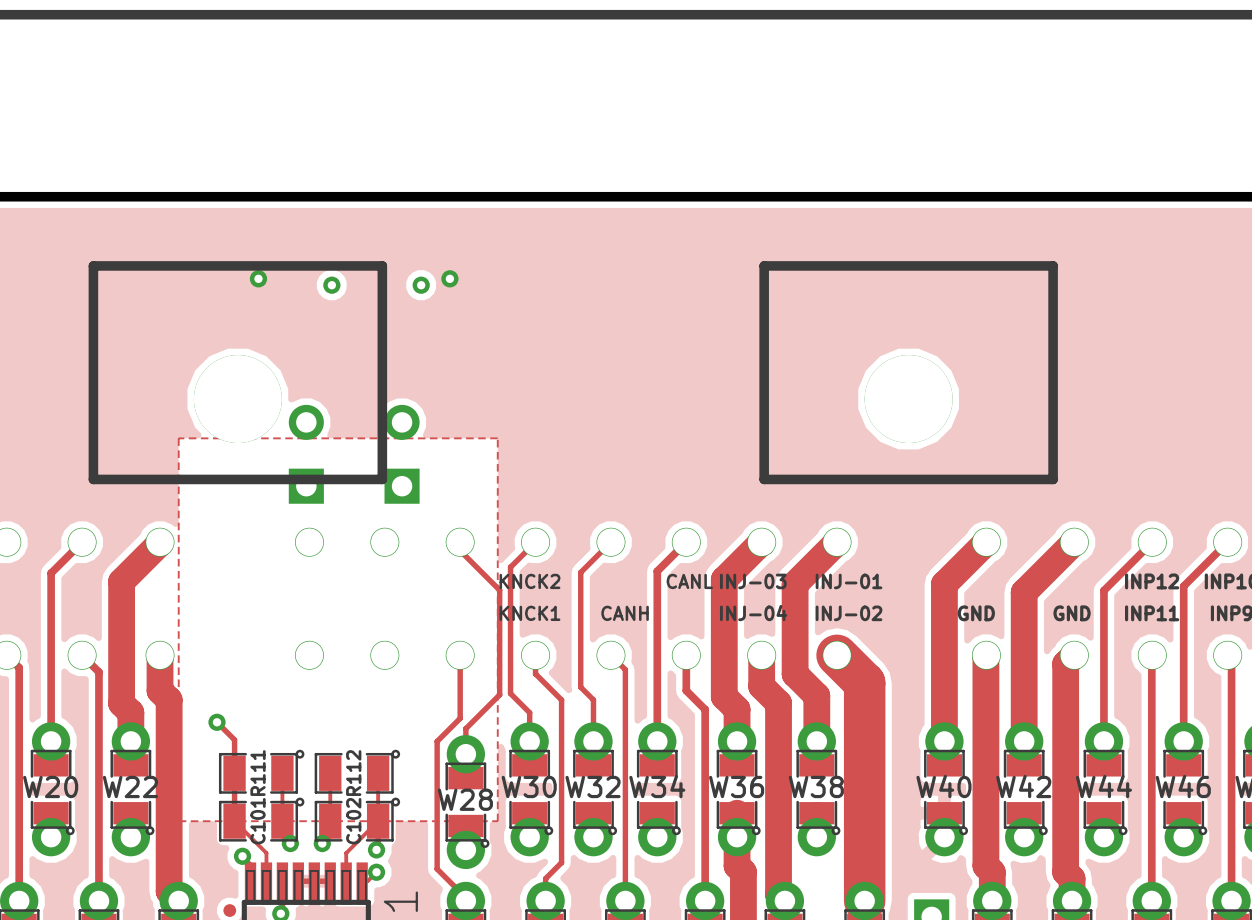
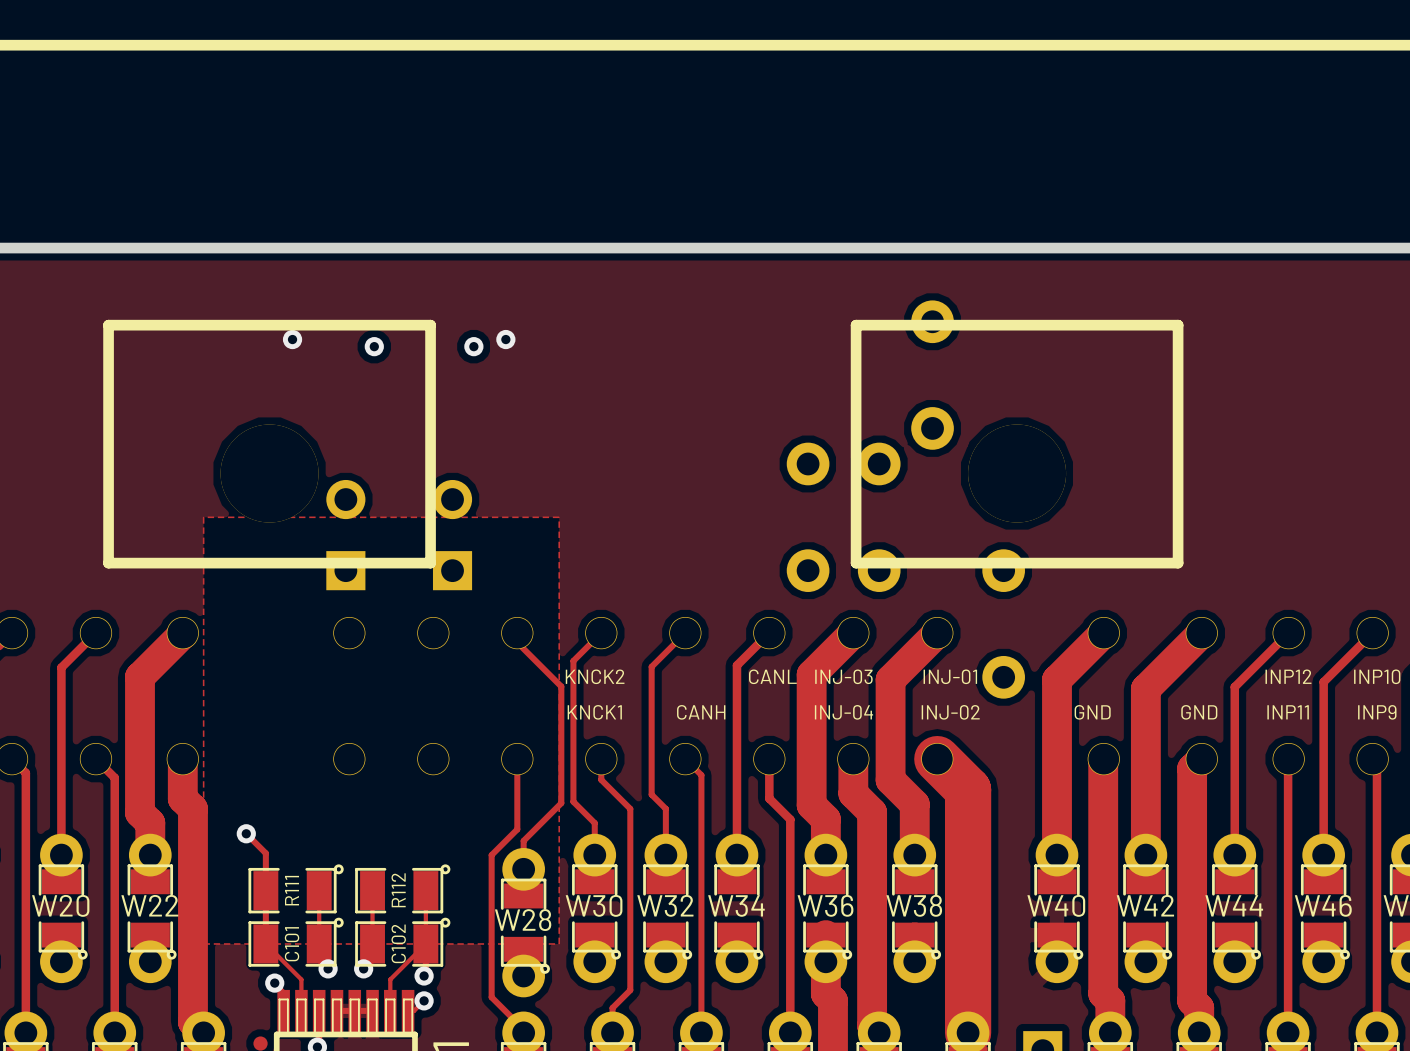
part: none -> (932, 375)
part: none -> (808, 517)
part: none -> (879, 517)
part: none -> (1003, 623)

